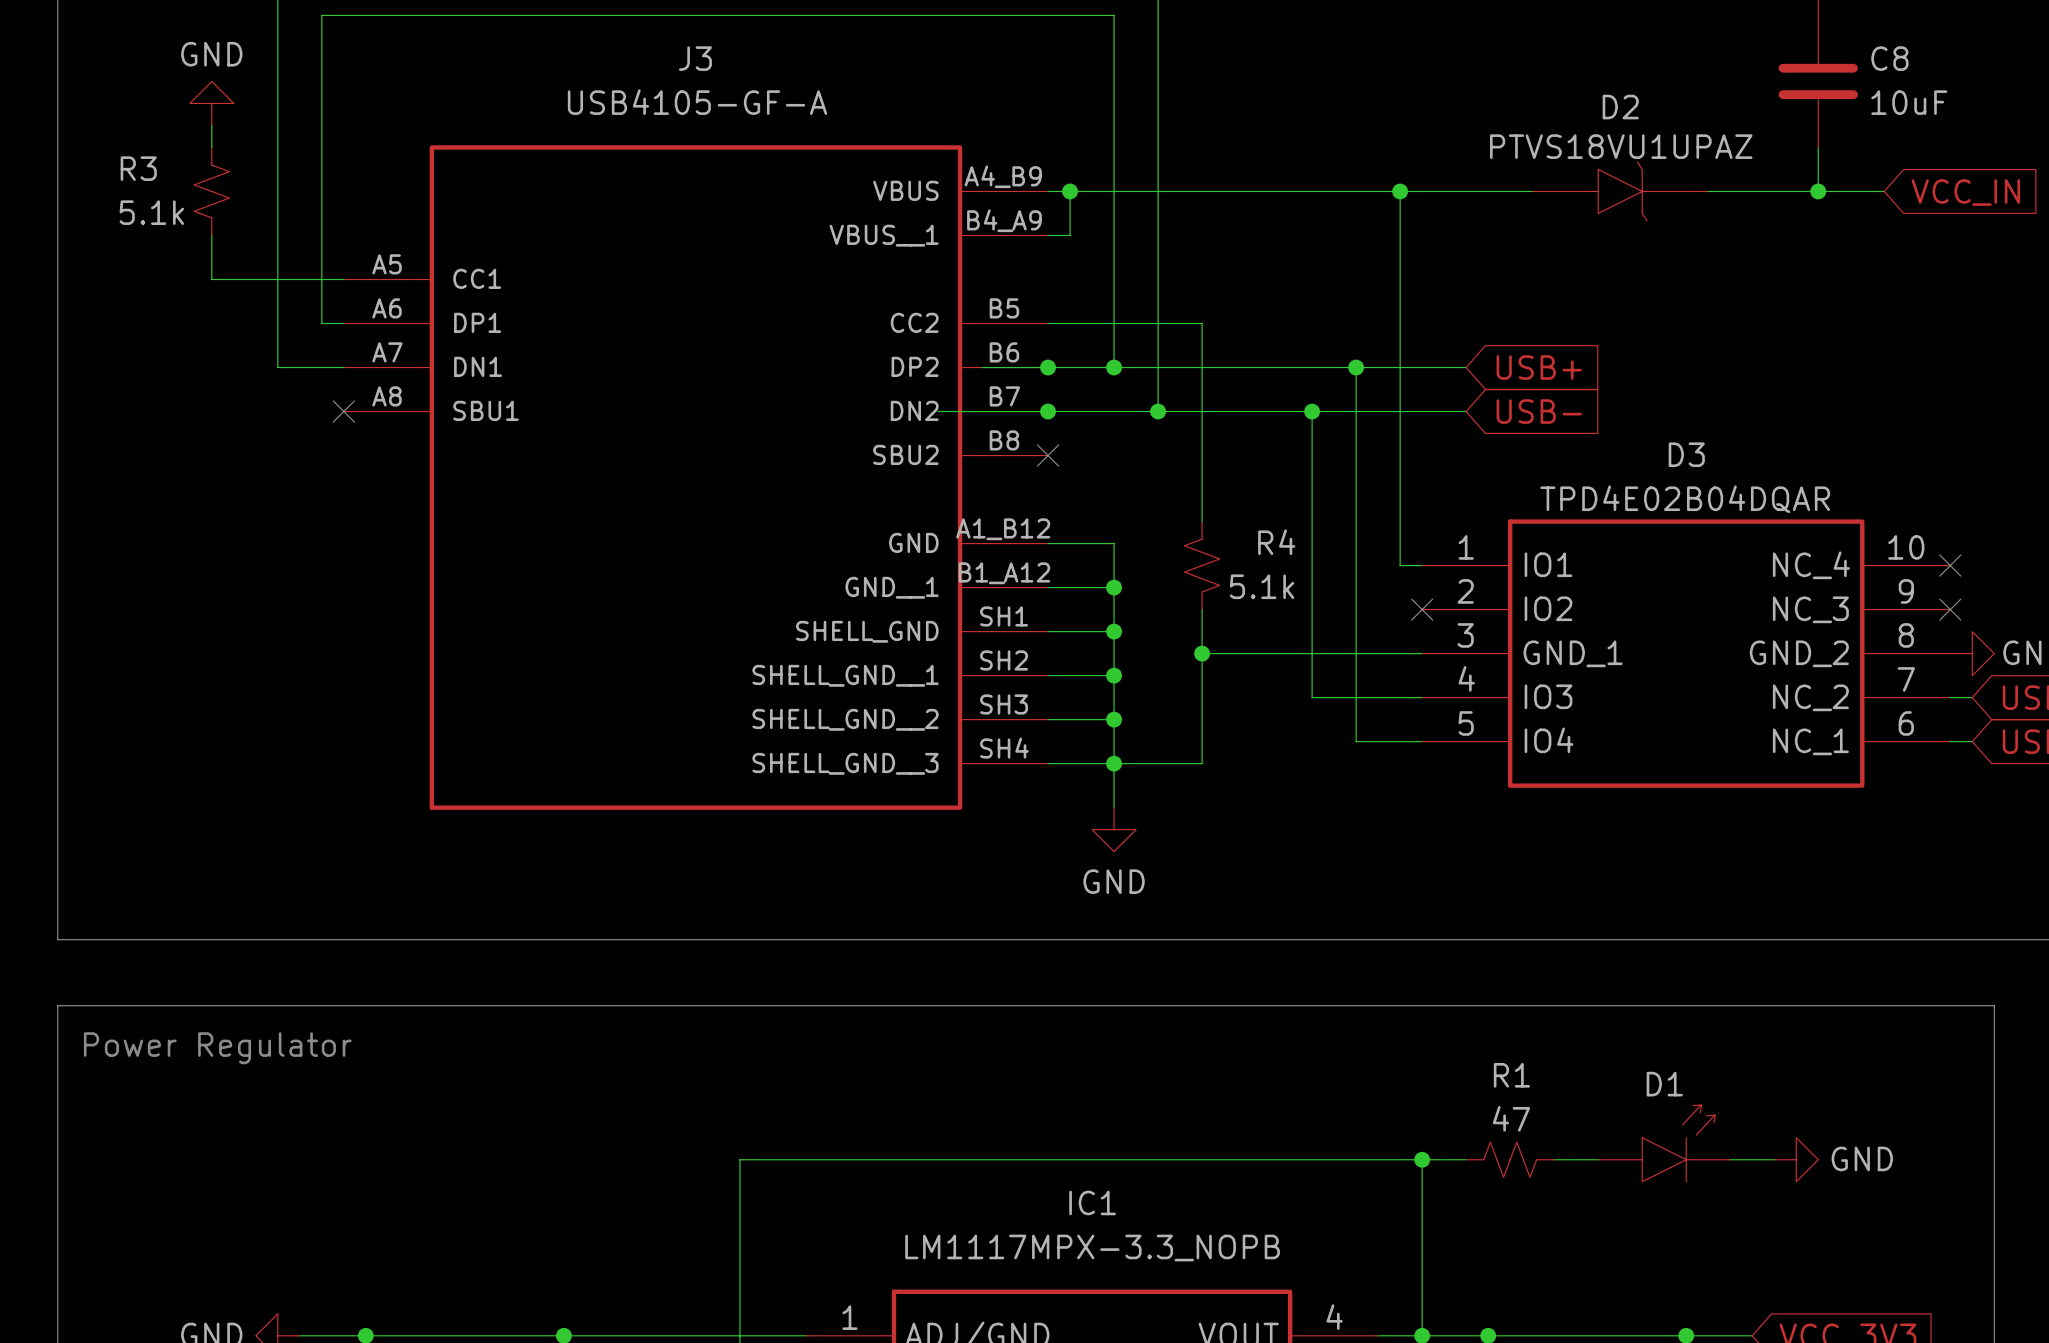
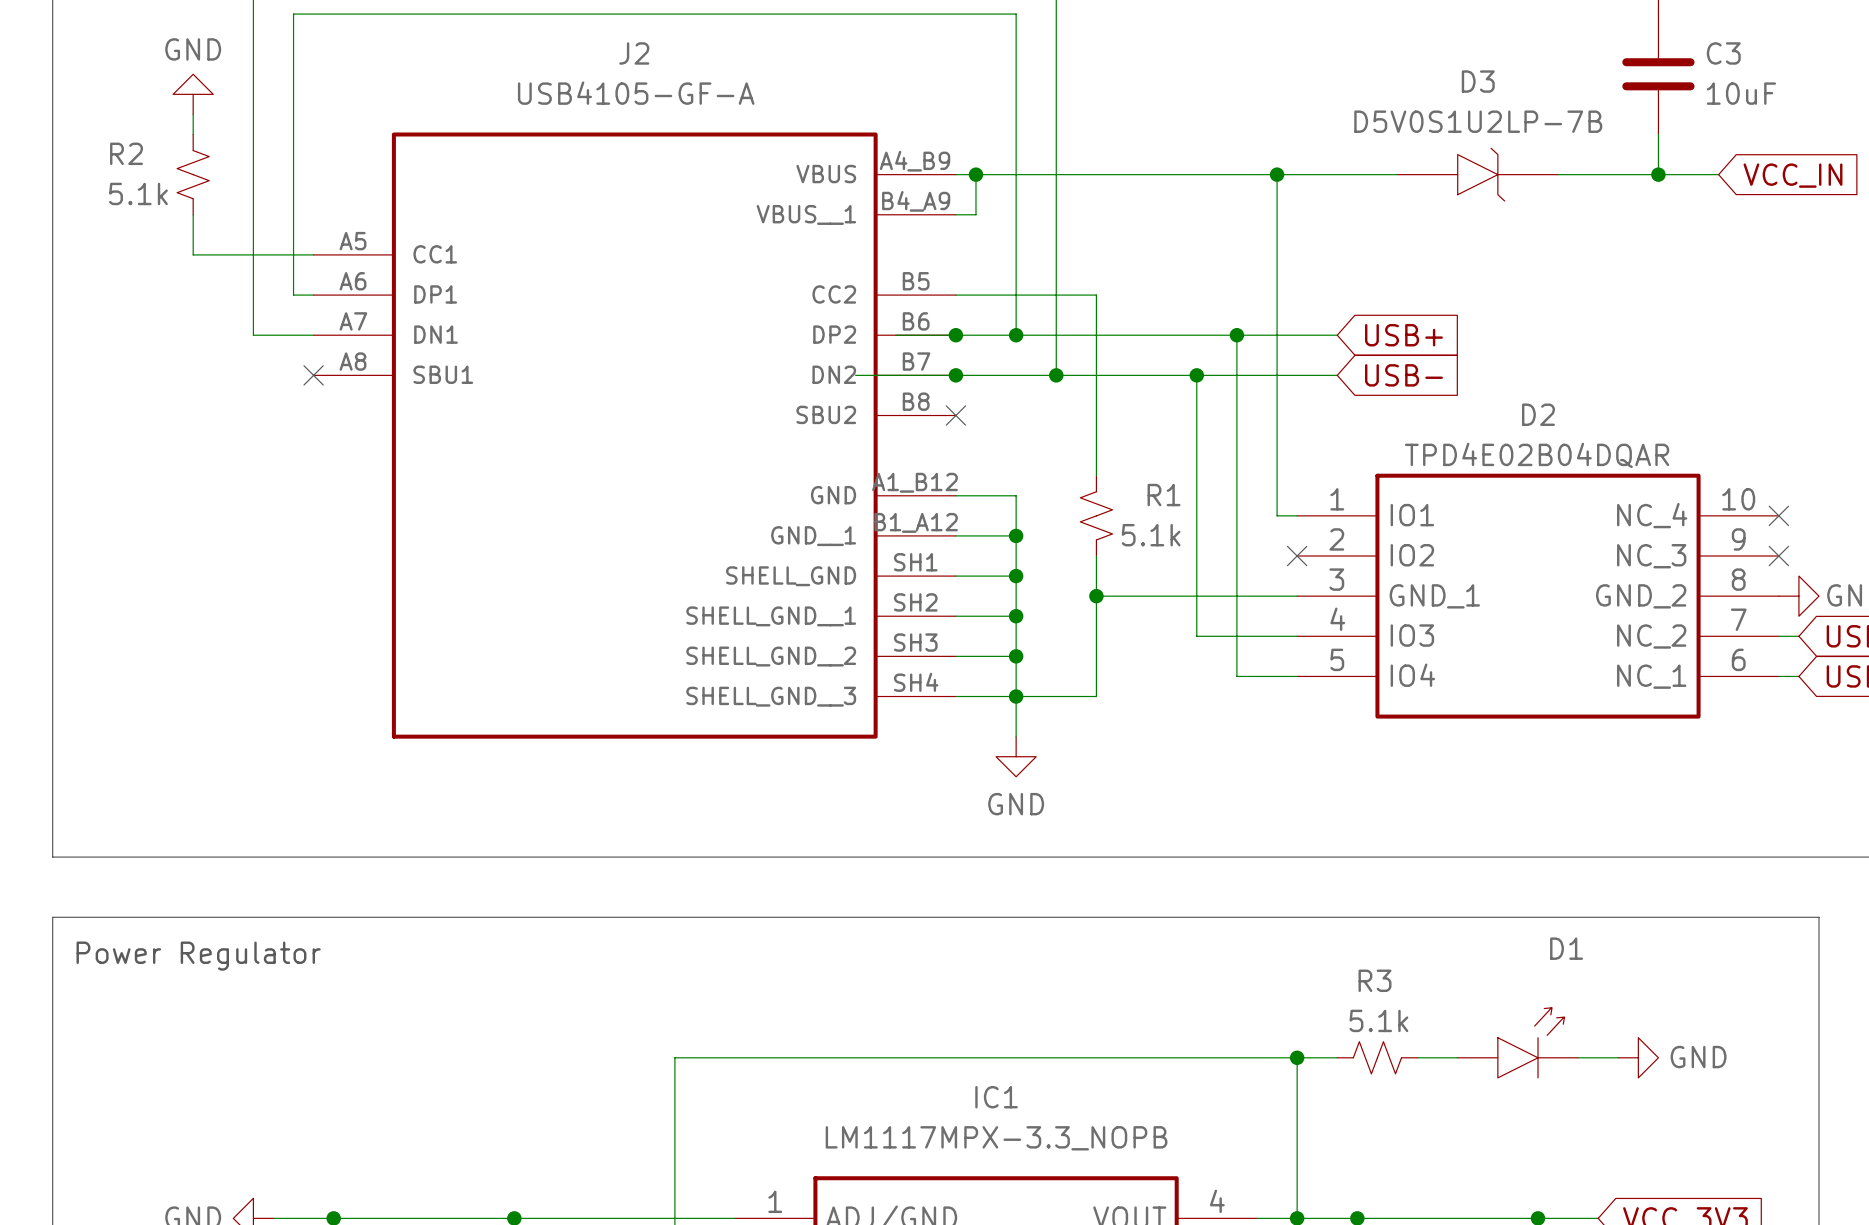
J3 name: J3 (695, 58) -> J2 (634, 53)
C8 name: C8 (1889, 58) -> C3 (1723, 53)
R3 name: R3 (138, 168) -> R2 (126, 153)
D2: PTVS18VU1UPAZ (1620, 191) -> none
D3: none -> D5V0S1U2LP-7B (1477, 174)
D3 name: D3 (1686, 454) -> D2 (1538, 414)
R4 name: R4 (1276, 542) -> R1 (1164, 495)
R1 name: R1 (1511, 1075) -> R3 (1374, 980)
D1 name position: D1 (1664, 1084) -> D1 (1566, 948)
R1 value: 47 (1511, 1118) -> 5.1k (1378, 1020)

